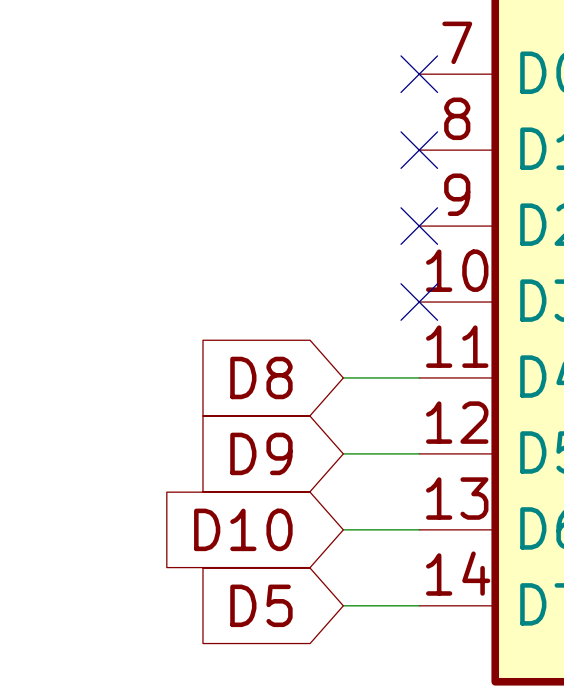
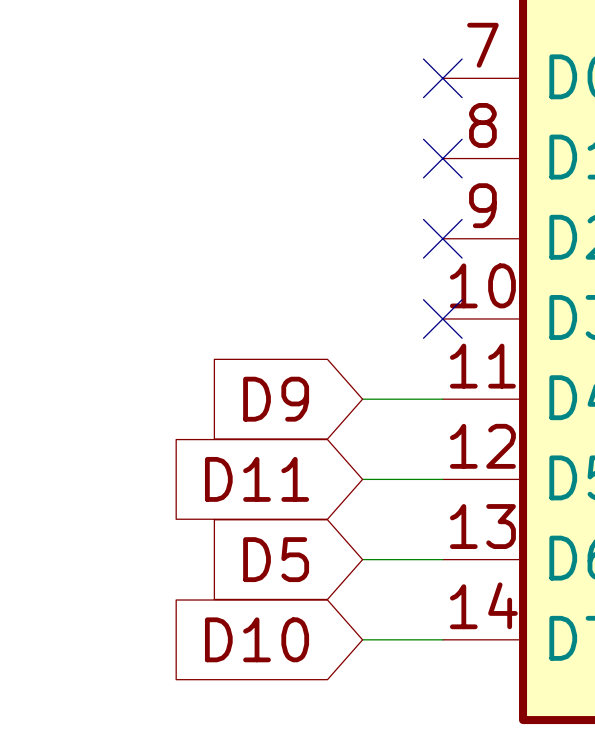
global label: D8 (261, 377) -> D9 (276, 399)
global label: D9 (261, 453) -> D11 (257, 479)
global label: D10 (243, 529) -> D5 (276, 559)
global label: D5 (261, 605) -> D10 (257, 639)

